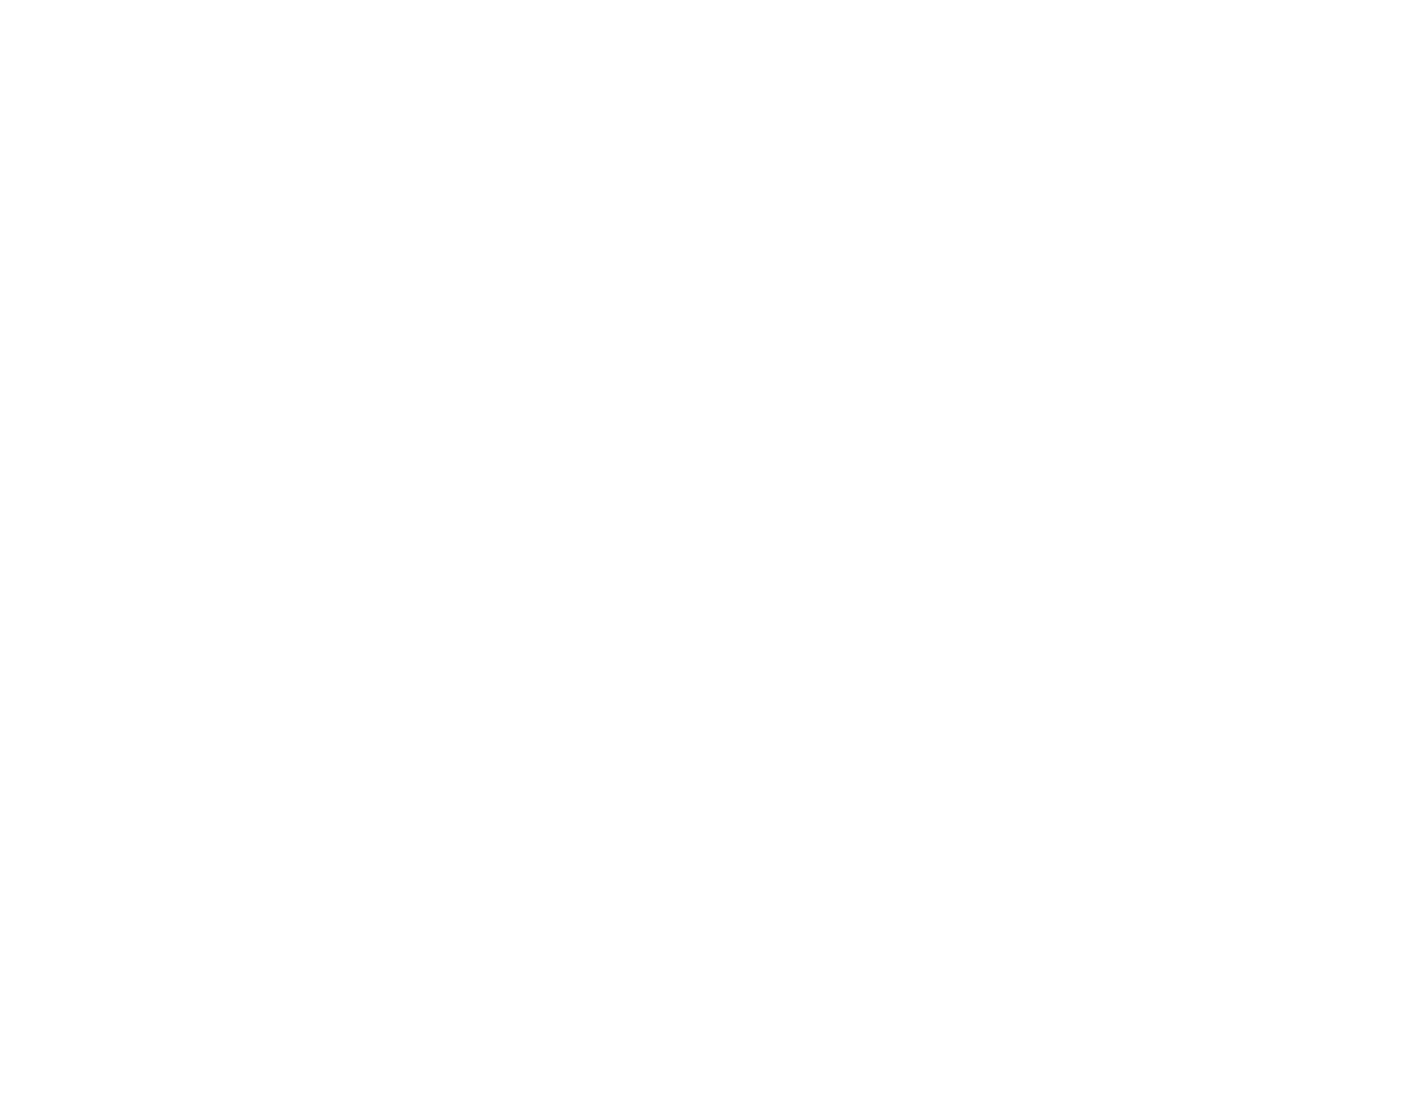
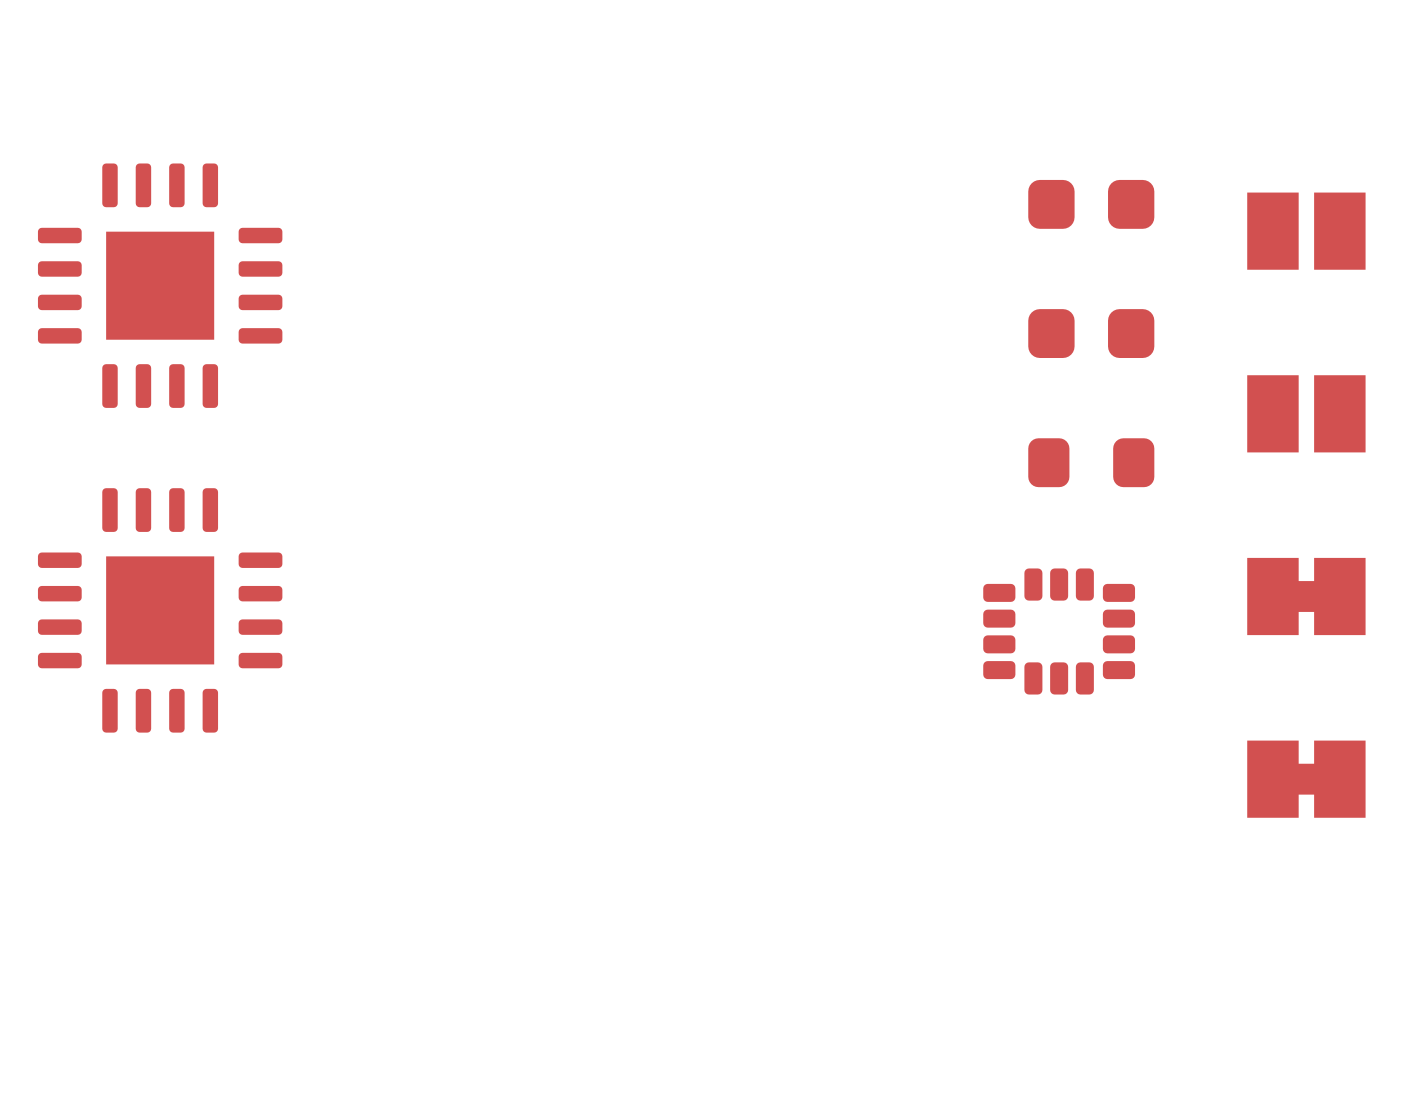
part: none -> (1091, 204)
part: none -> (1306, 231)
part: none -> (160, 285)
part: none -> (1091, 333)
part: none -> (1306, 413)
part: none -> (1091, 462)
part: none -> (1306, 596)
part: none -> (160, 610)
part: none -> (1059, 631)
part: none -> (1306, 779)

